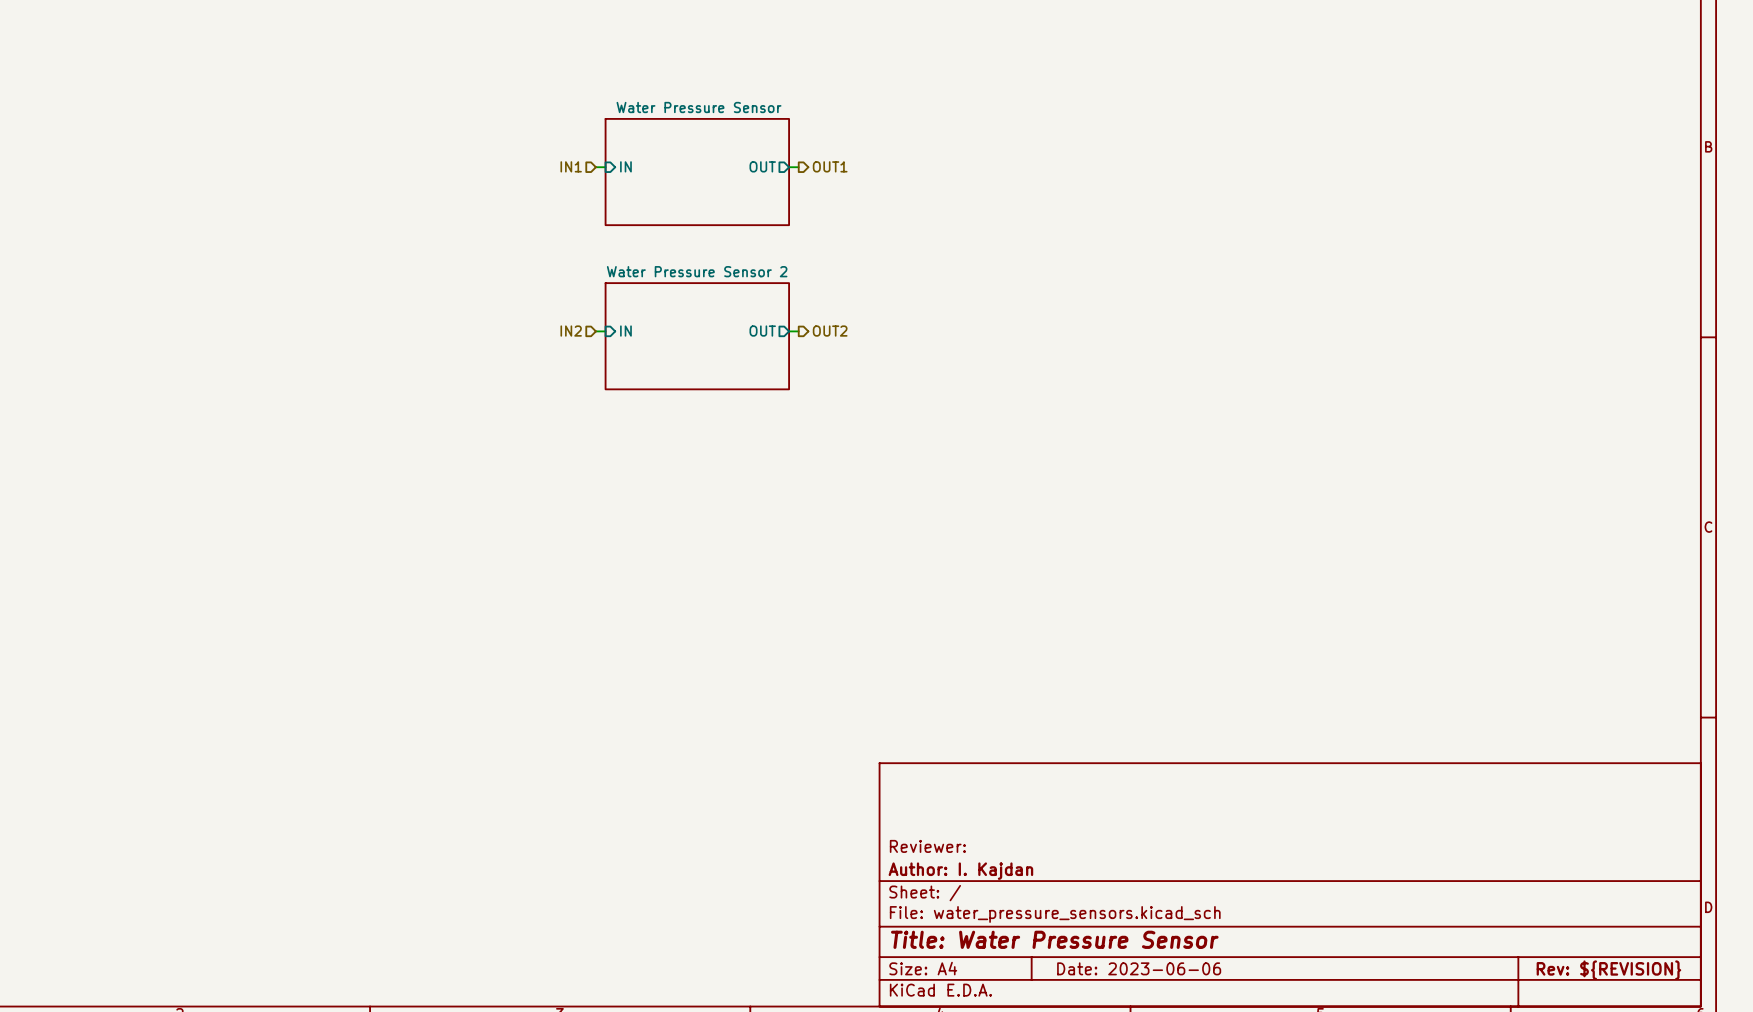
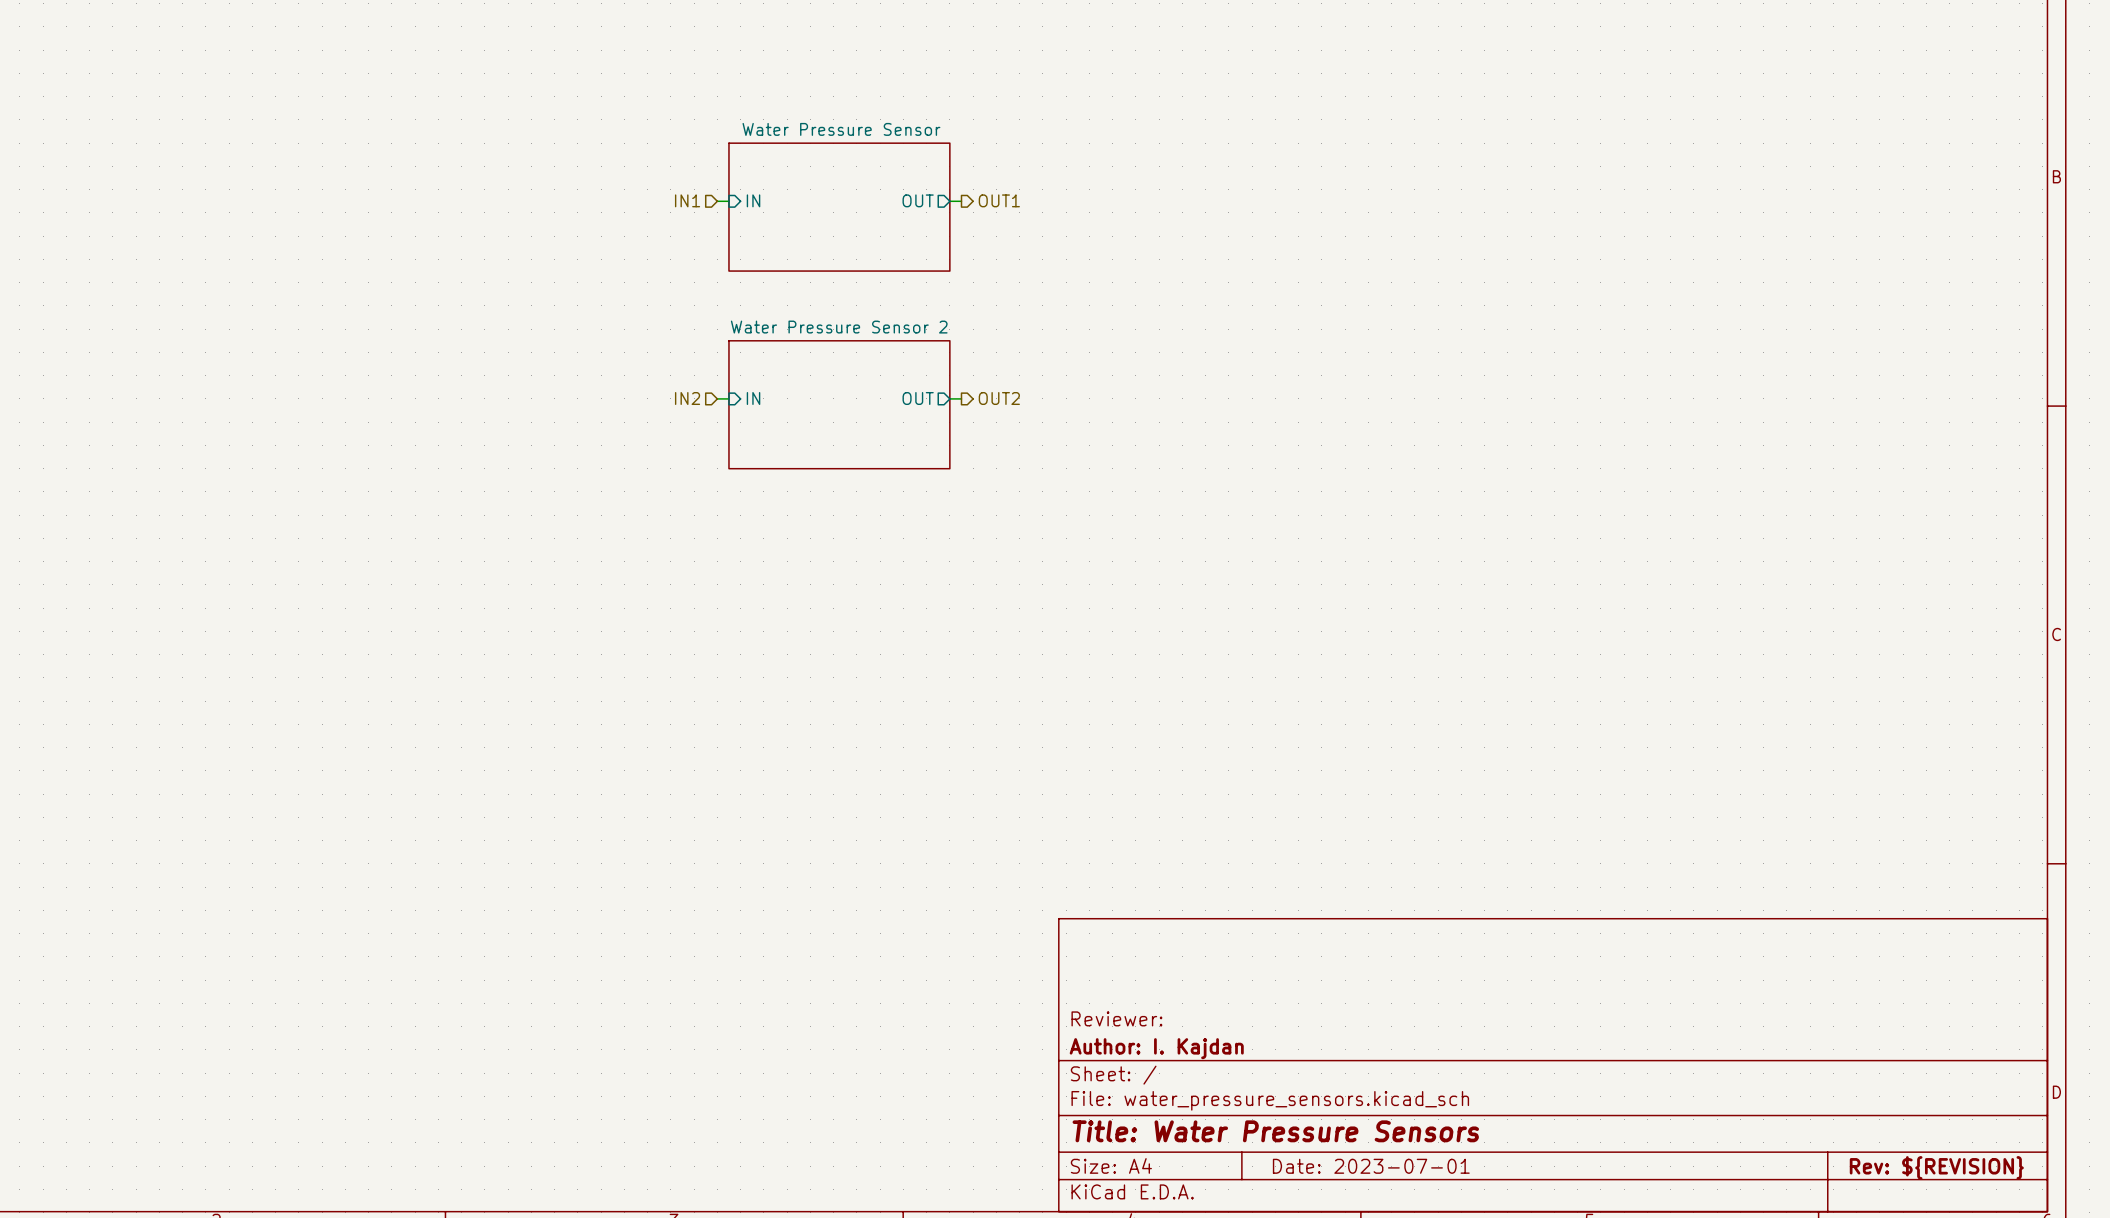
title block: Title: Water Pressure Sensor (1054, 939) -> Title: Water Pressure Sensors (1275, 1131)
title block: Date: 2023-06-06 (1139, 968) -> Date: 2023-07-01 (1371, 1166)

